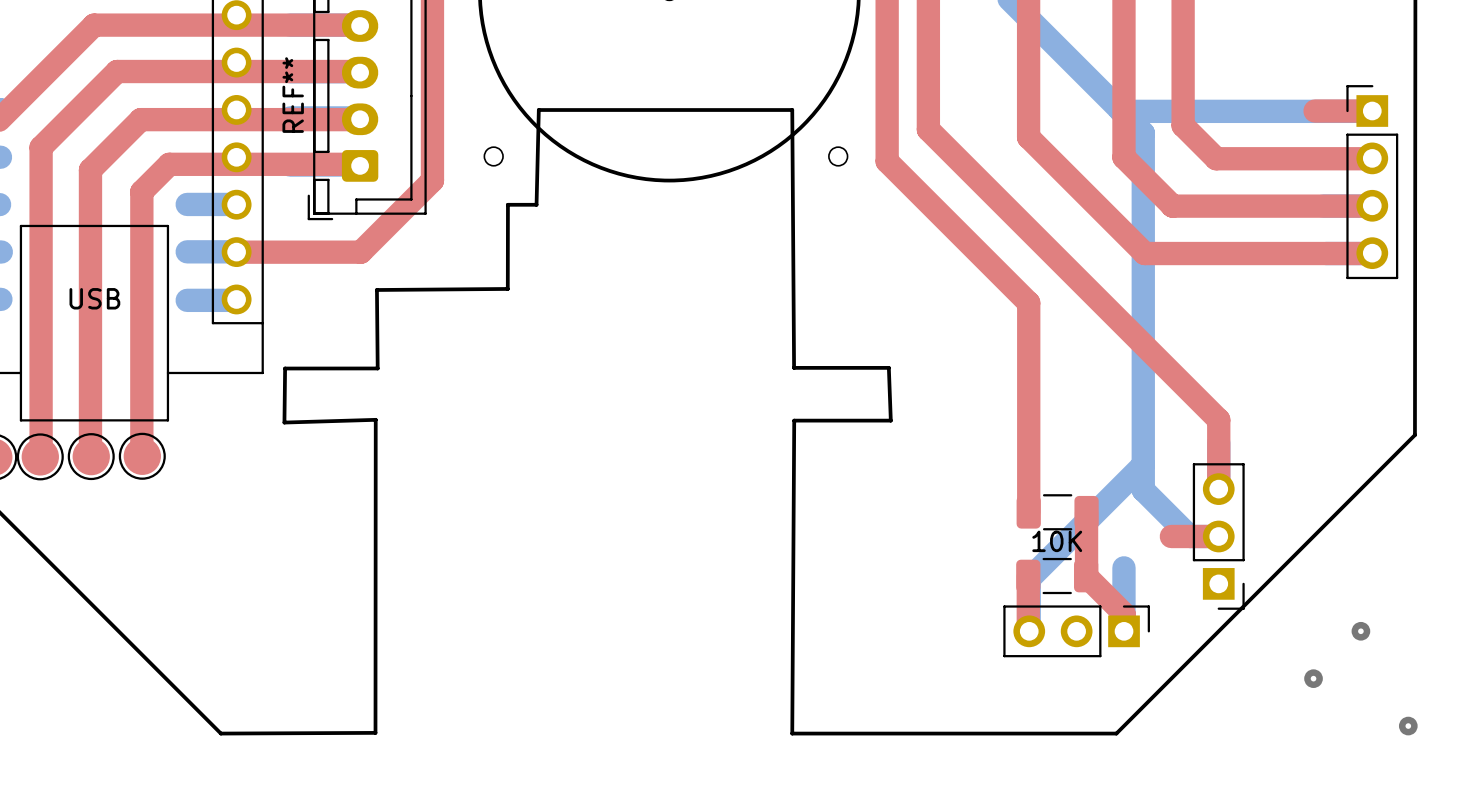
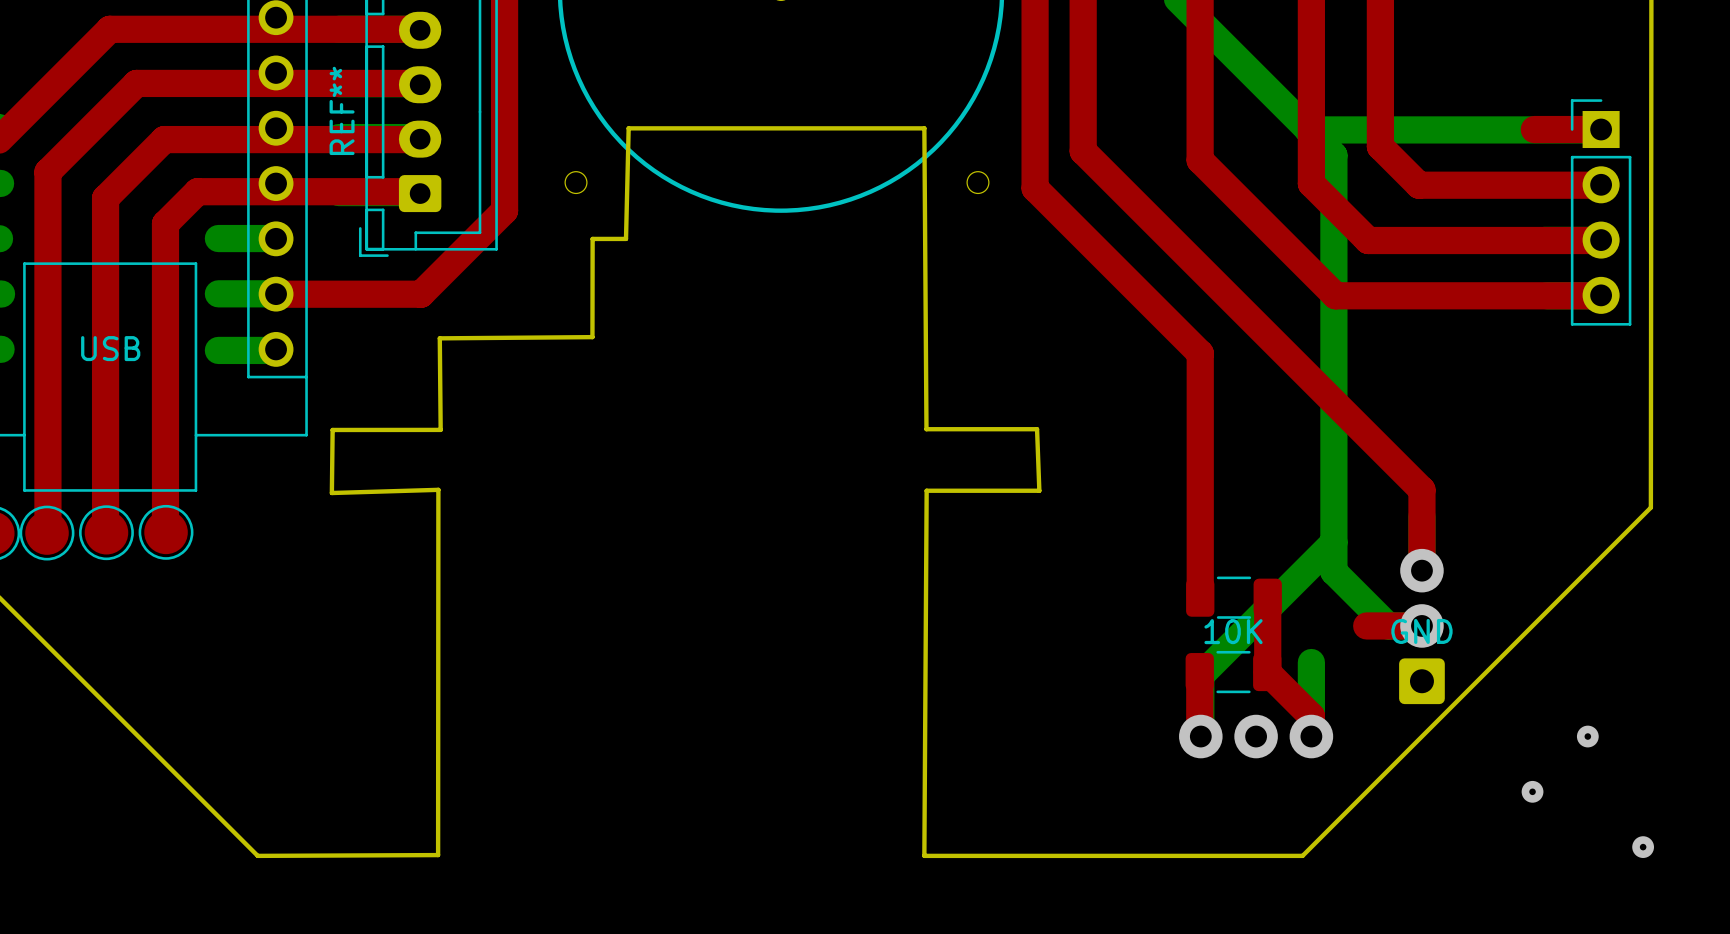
via: none -> (1421, 570)
part: (1218, 536) -> none
via: none -> (1421, 625)
GND: none -> (1421, 681)
via: none -> (1200, 736)
part: (1076, 631) -> none
via: none -> (1256, 736)
via: none -> (1311, 736)

